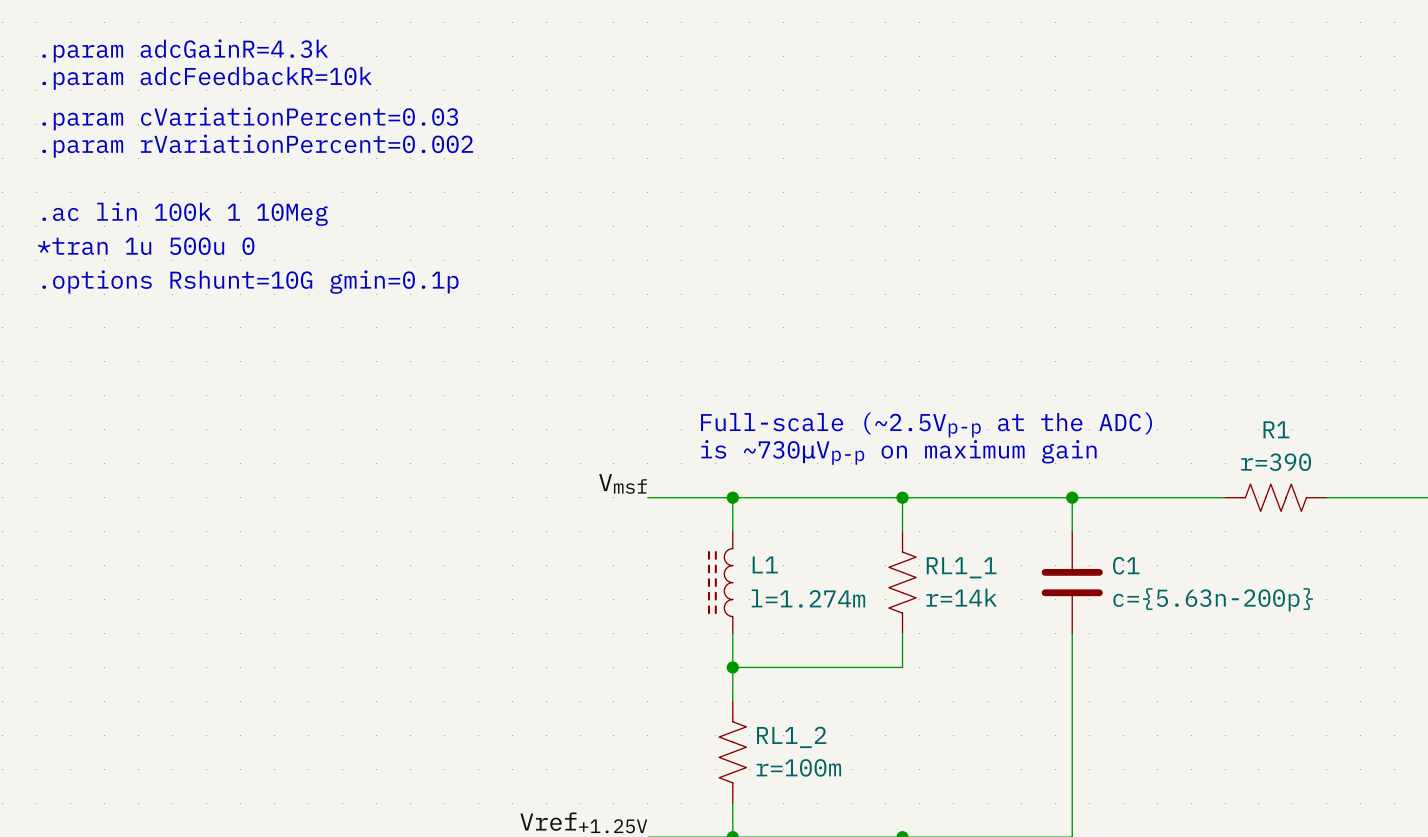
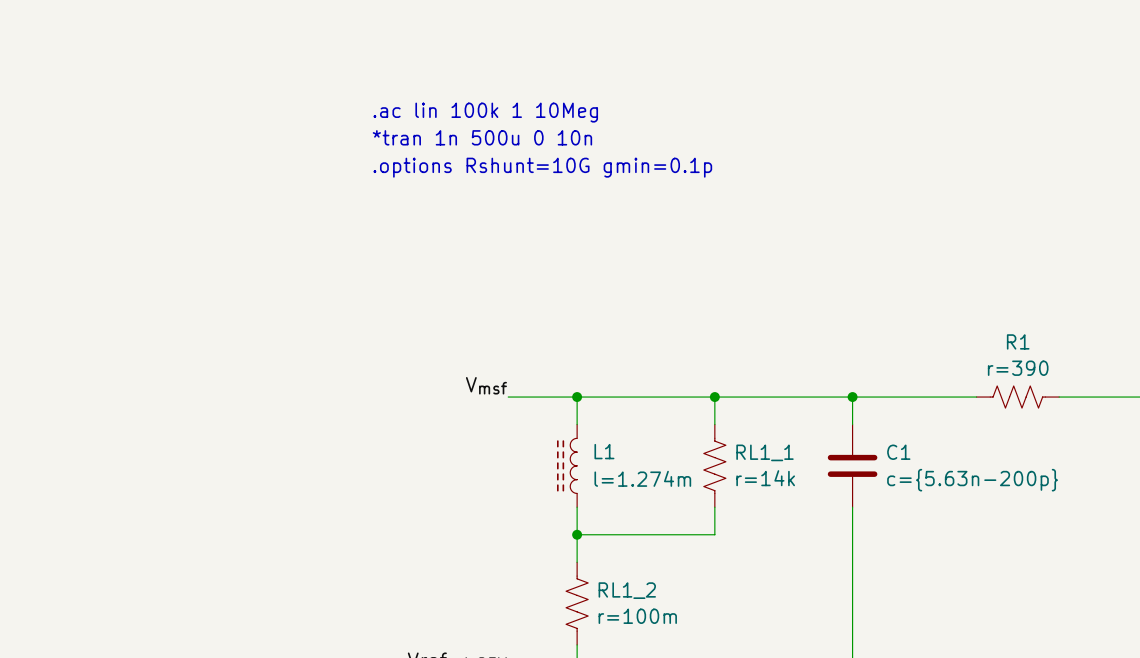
text: .param adcGainR=4.3k (185, 50) -> none
text: .param adcFeedbackR=10k (207, 78) -> none
text: .param cVariationPercent=0.03 (250, 118) -> none
text: .param rVariationPercent=0.002 (257, 146) -> none
text: none -> .ac lin 100k 1 10Meg (485, 112)
text: none -> *tran 1n 500u 0 10n (482, 137)
text: .ac lin 100k 1 10Meg (185, 214) -> none
text: none -> .options Rshunt=10G gmin=0.1p (542, 167)
text: *tran 1u 500u 0 (146, 246) -> none
text: .options Rshunt=10G gmin=0.1p (250, 282) -> none
text: Full-scale (~2.5Vp-p at the ADC) (926, 425) -> none
text: is ~730μVp-p on maximum gain (899, 452) -> none

